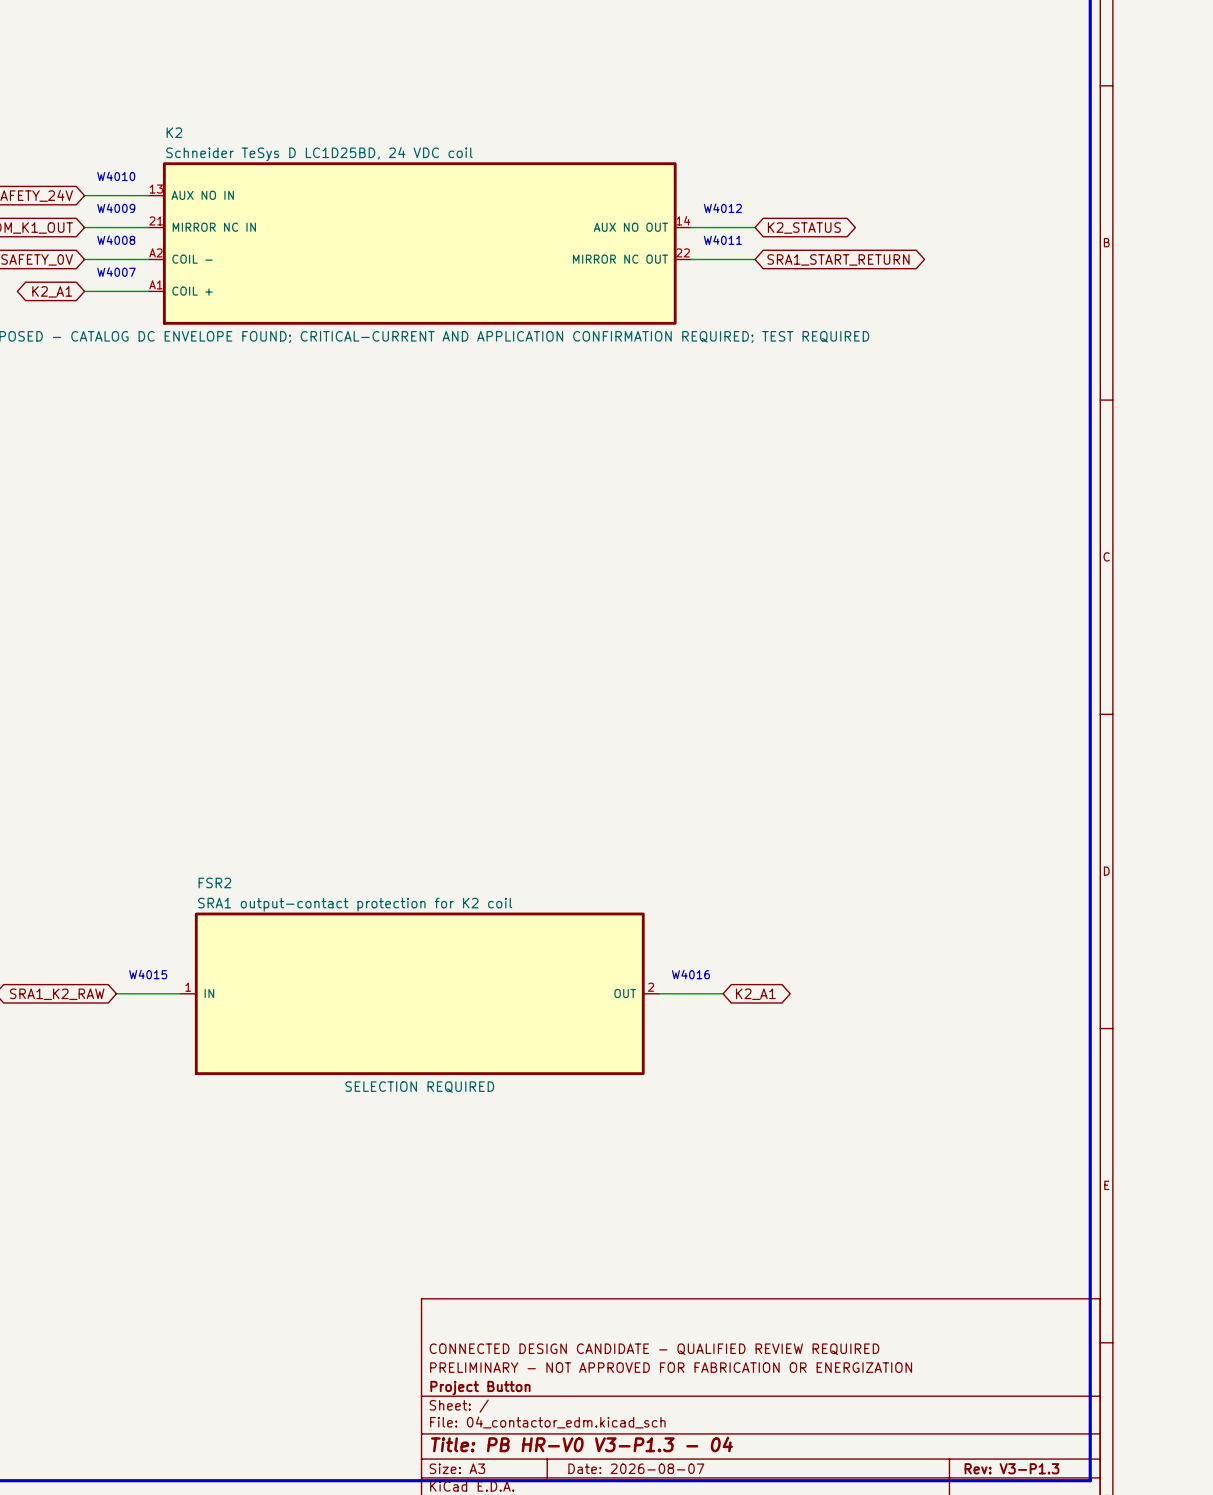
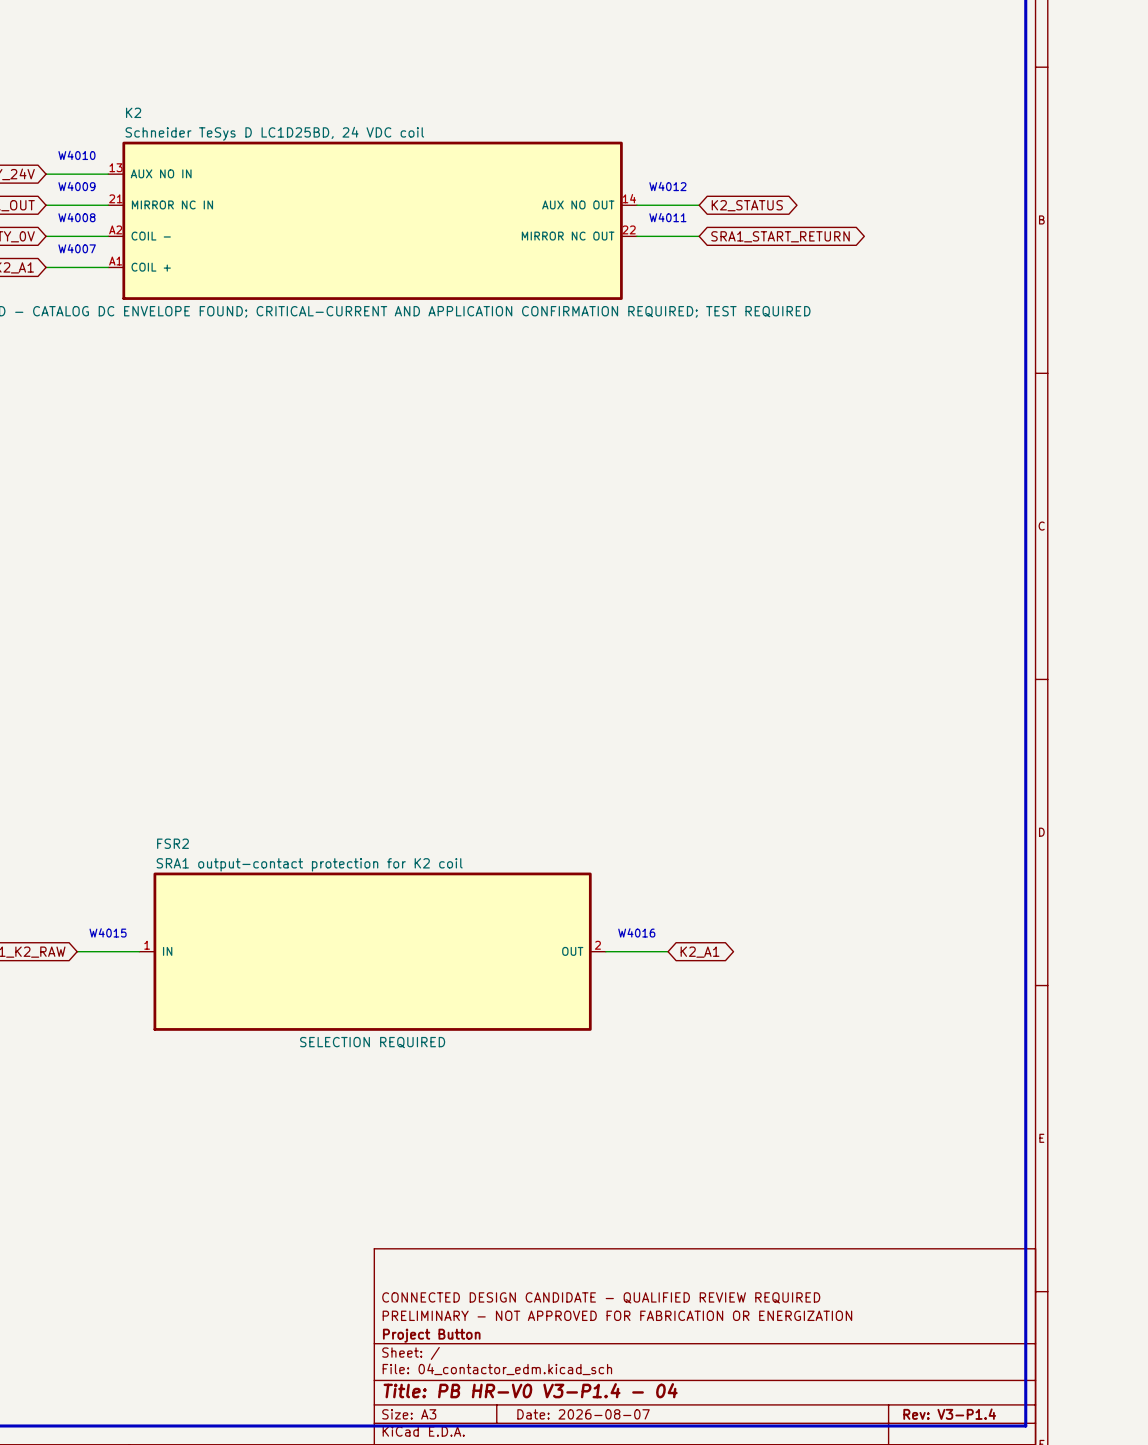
title block: Title: PB HR-V0 V3-P1.3 - 04 (581, 1444) -> Title: PB HR-V0 V3-P1.4 - 04 (530, 1390)
title block: Rev: V3-P1.3 (1011, 1468) -> Rev: V3-P1.4 (949, 1414)

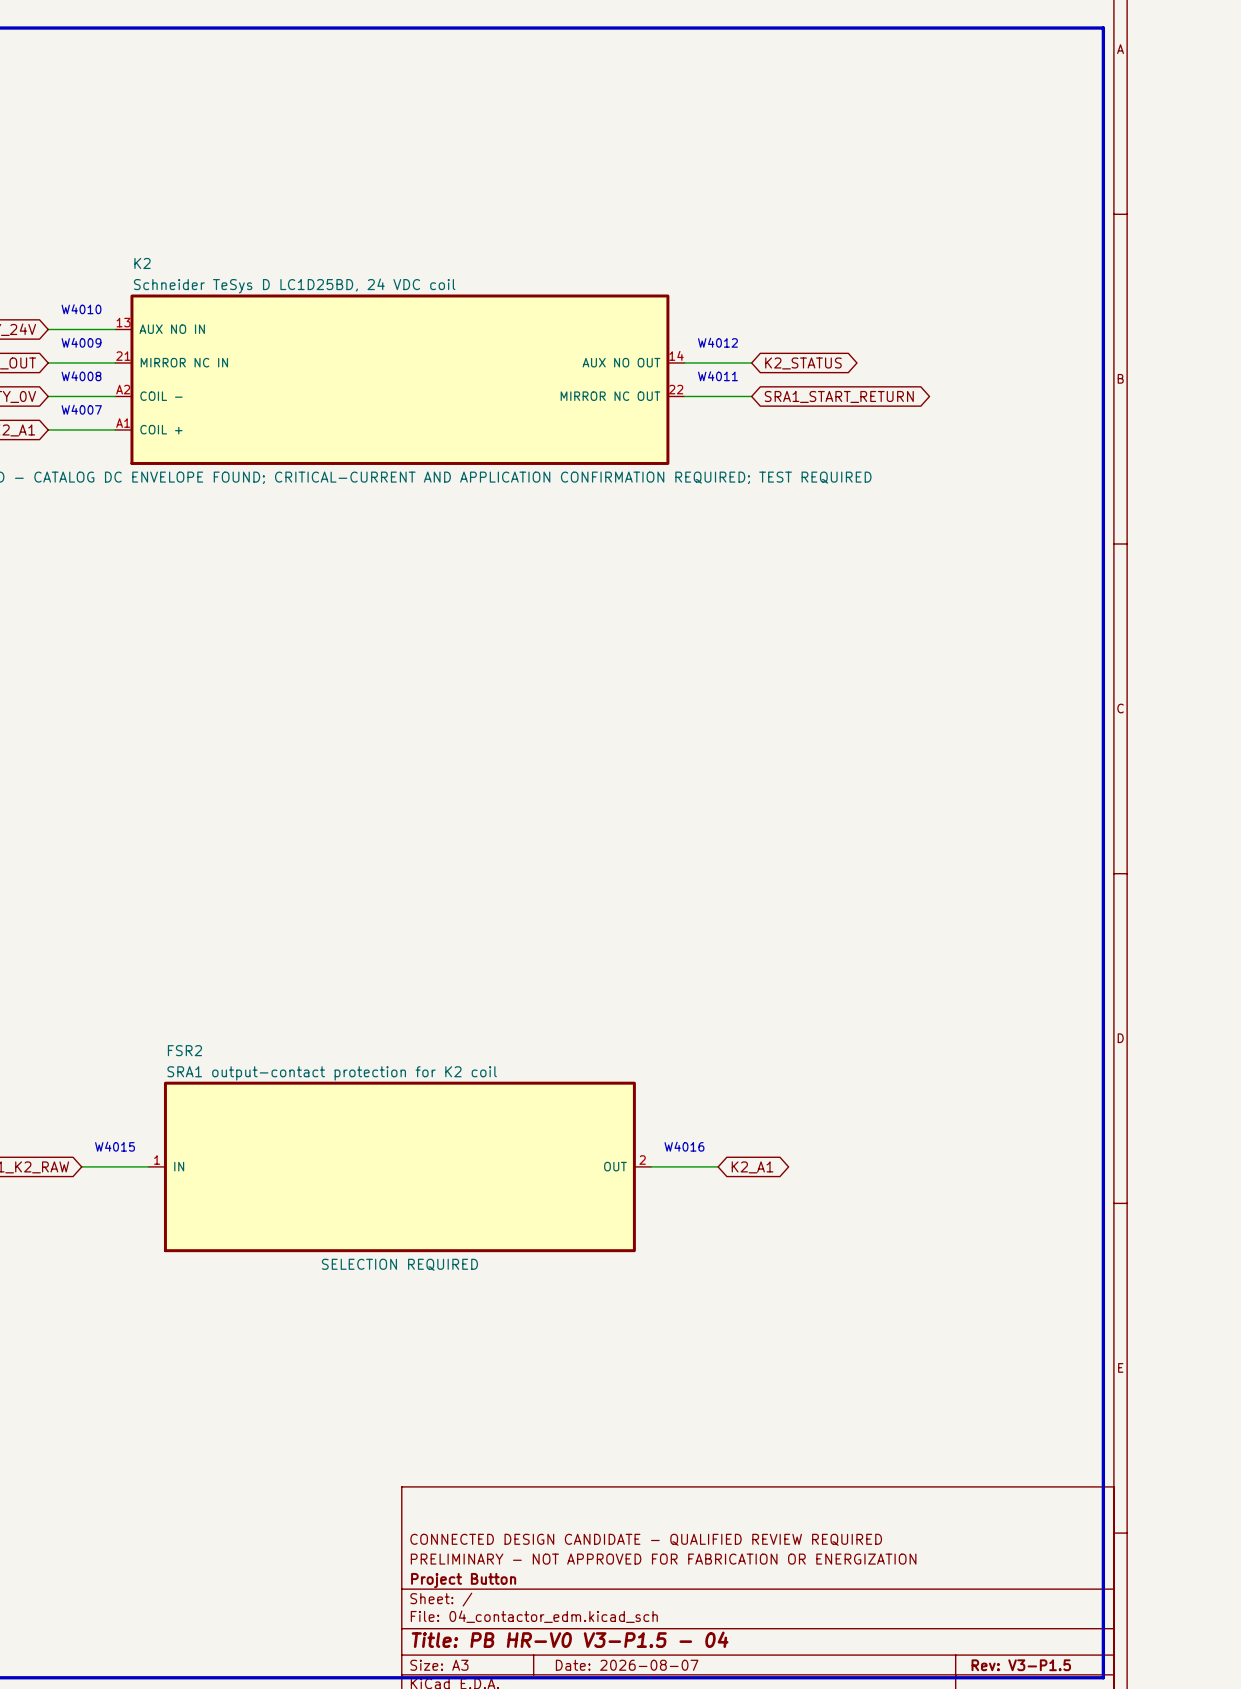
title block: Title: PB HR-V0 V3-P1.4 - 04 (530, 1390) -> Title: PB HR-V0 V3-P1.5 - 04 (570, 1639)
title block: Rev: V3-P1.4 (949, 1414) -> Rev: V3-P1.5 (1021, 1665)

